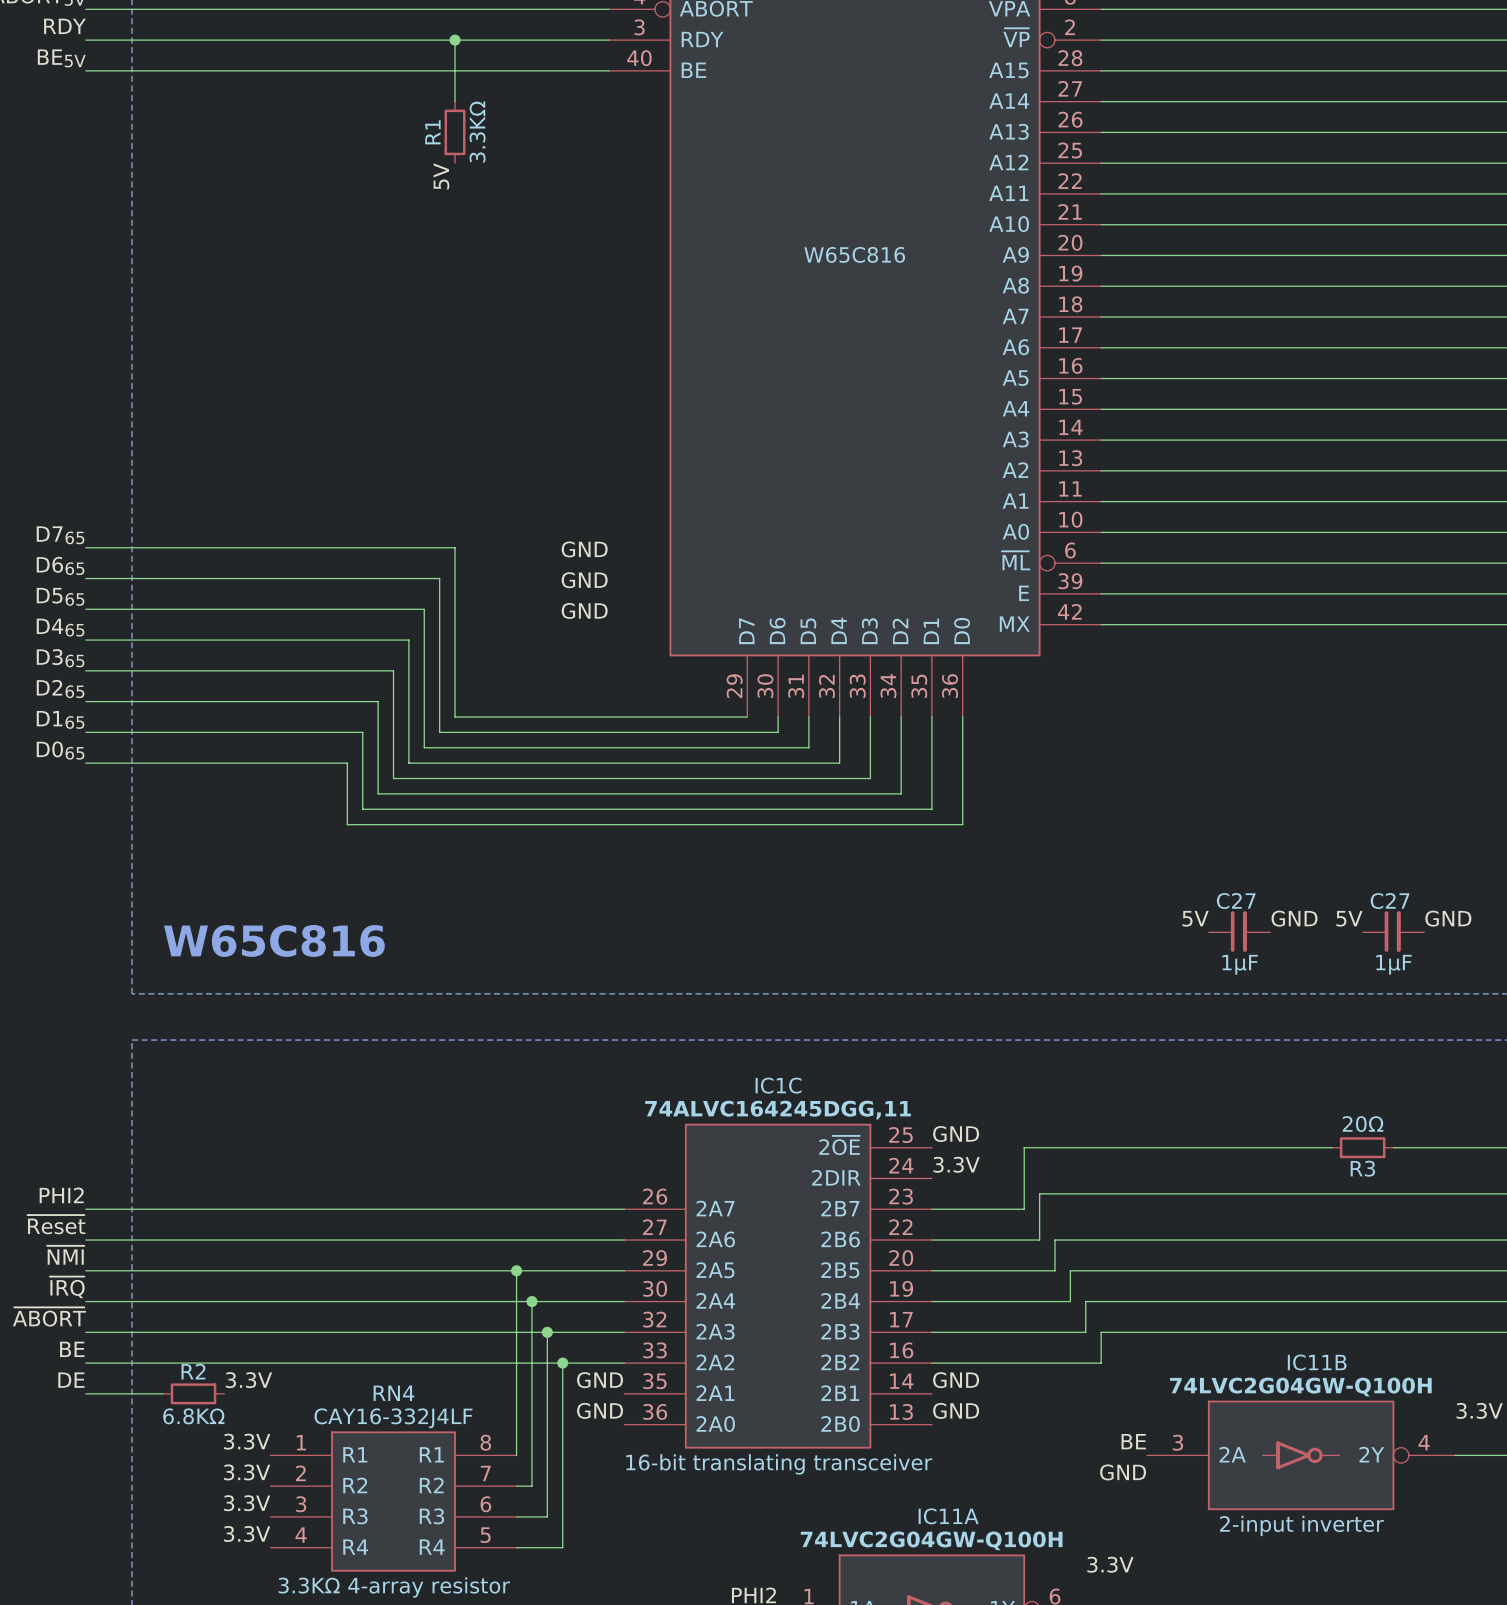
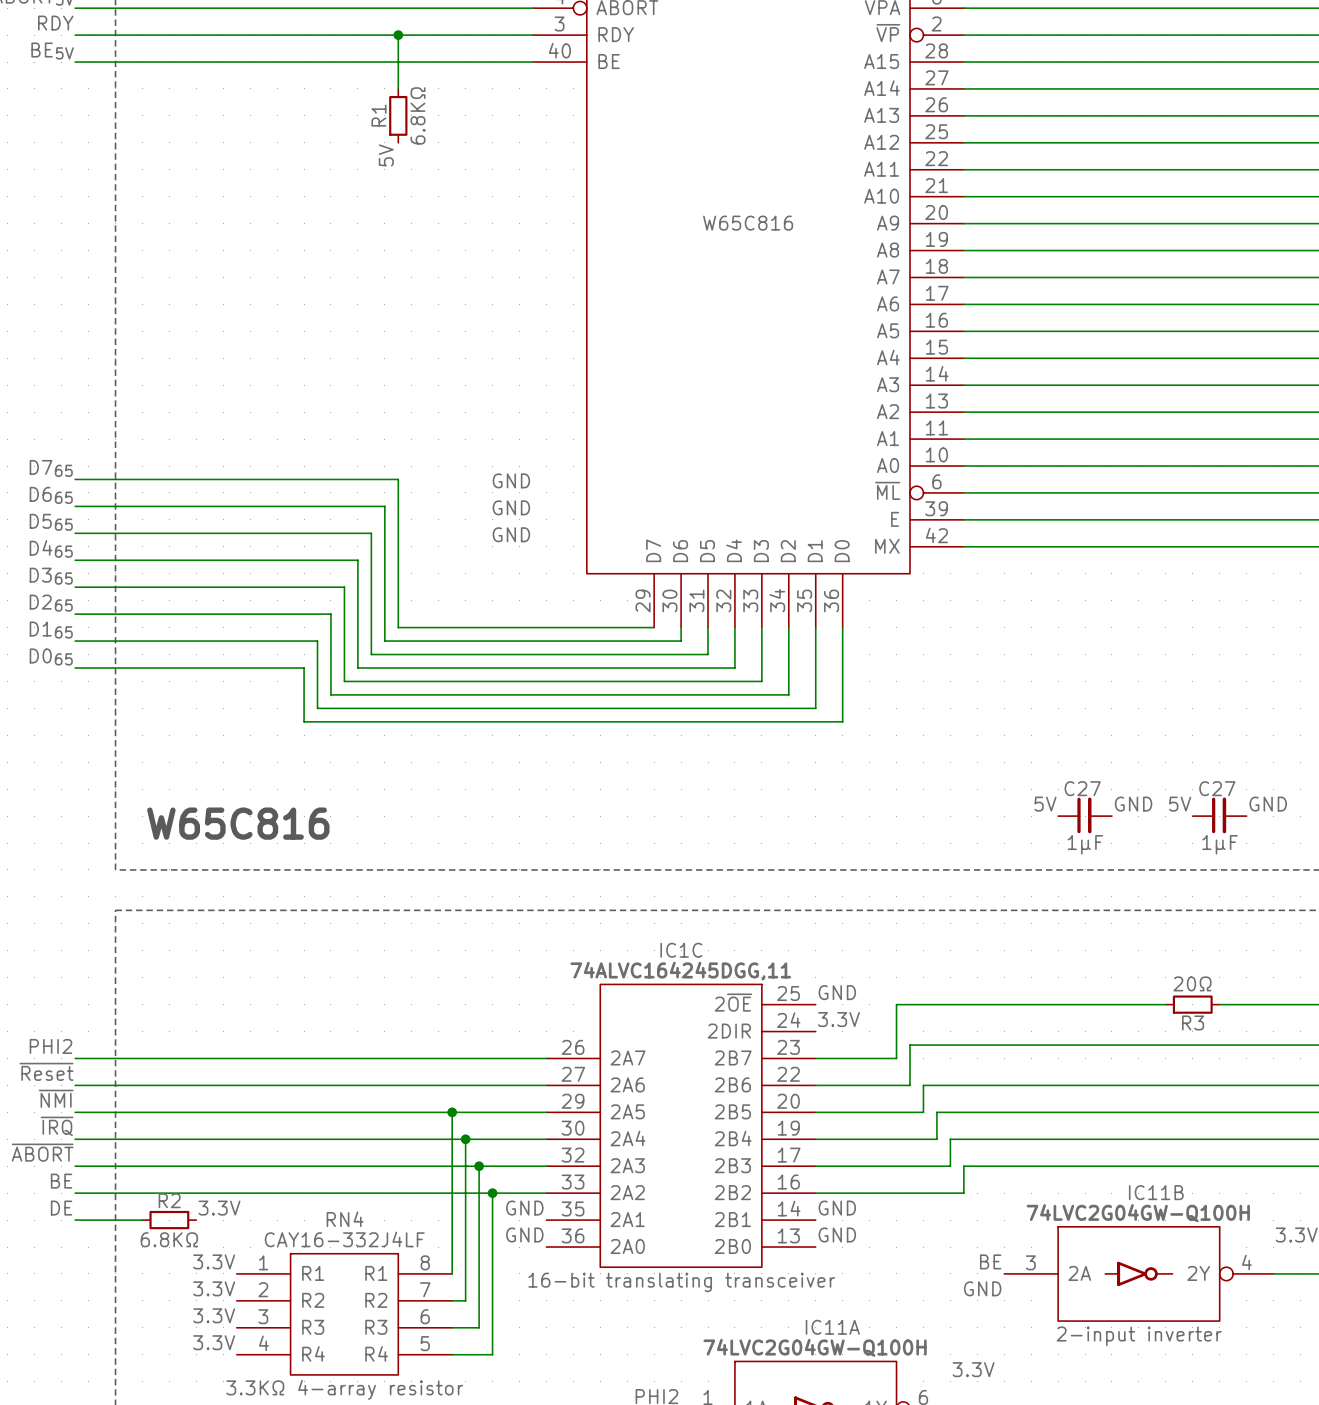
R1 value: 3.3KΩ (477, 132) -> 6.8KΩ (418, 115)

